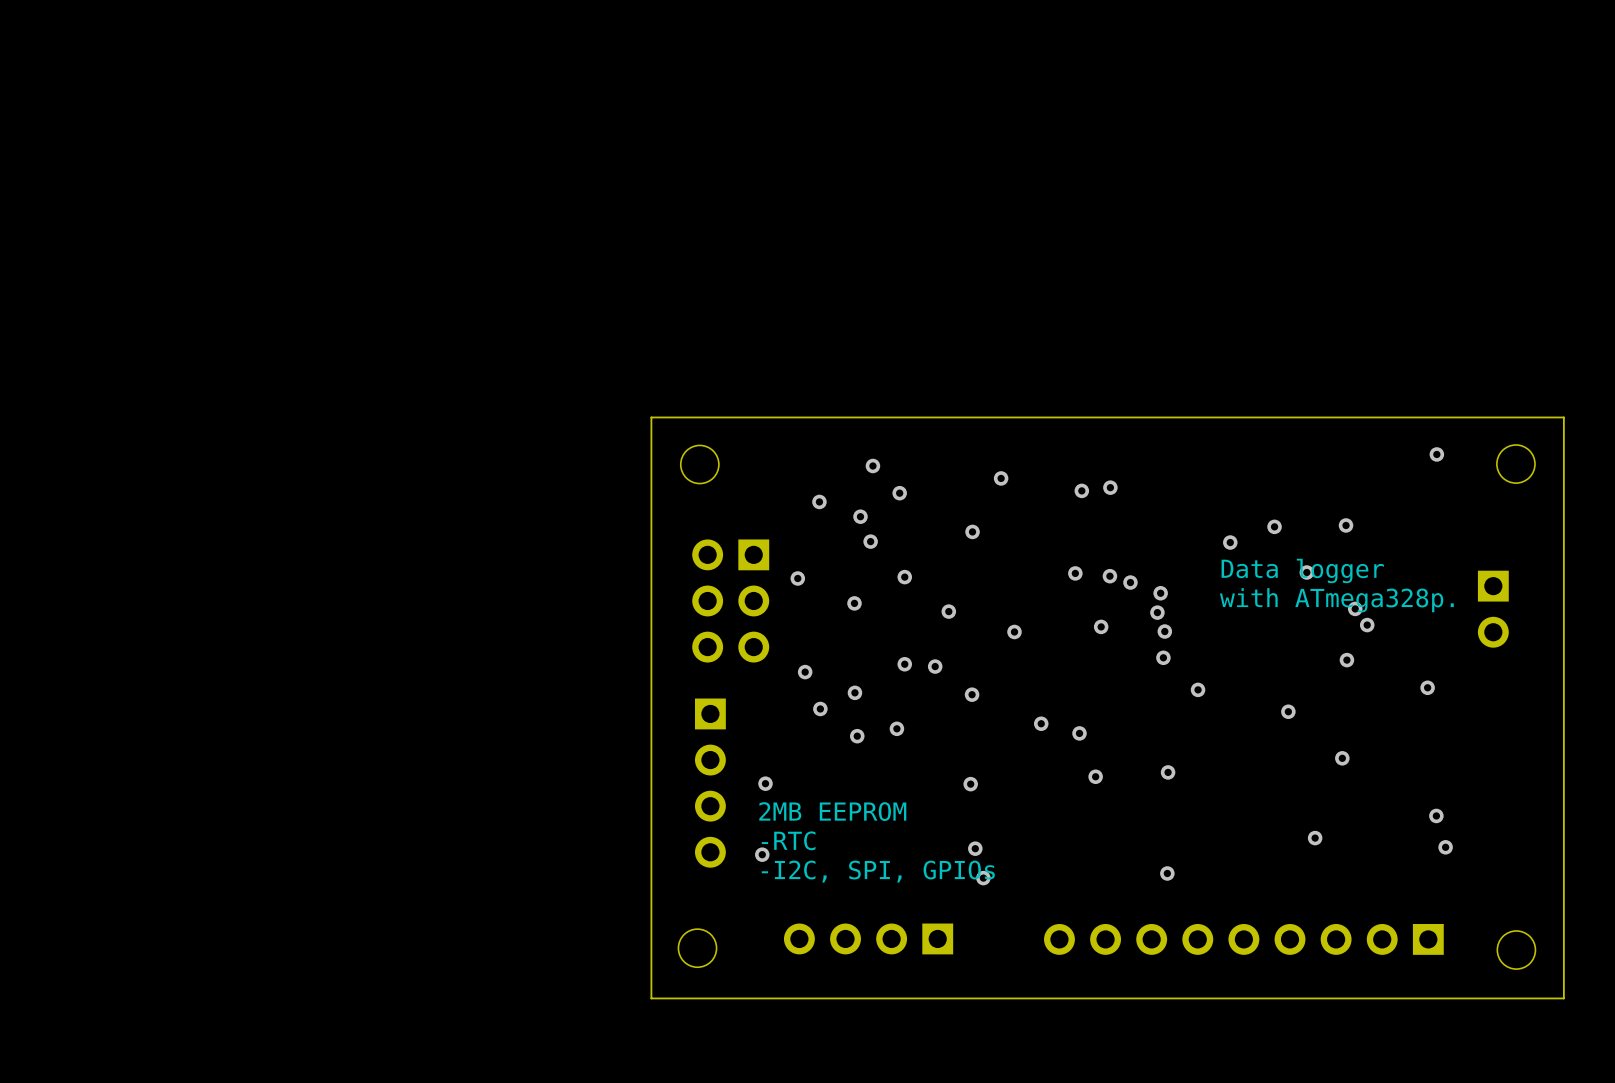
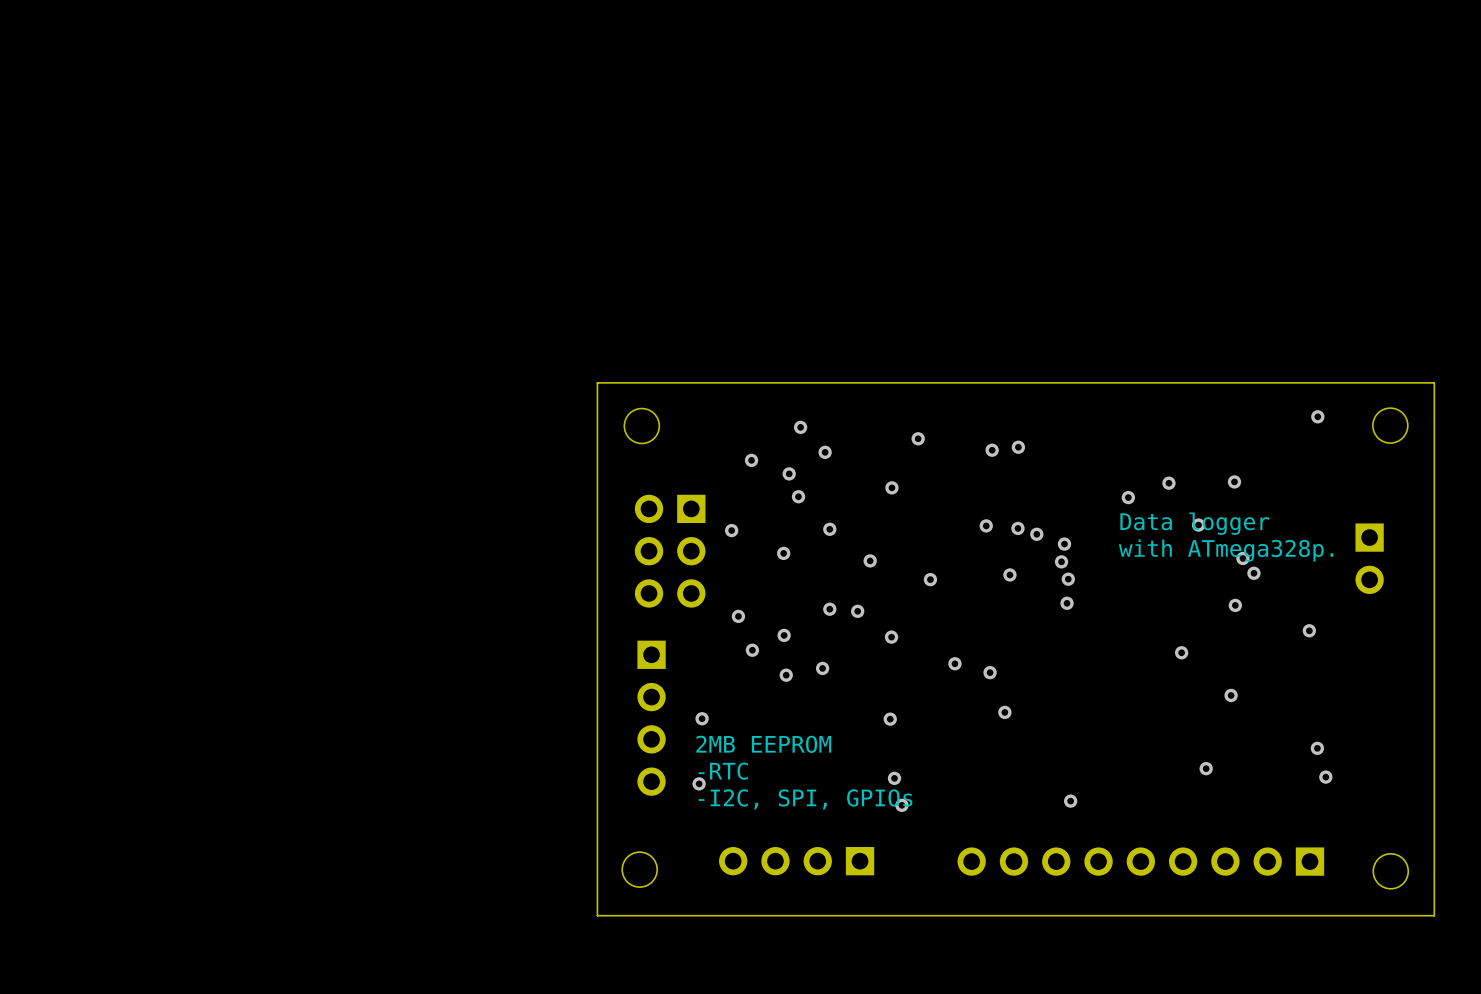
via: (1198, 689) -> none
via: (1168, 772) -> none

